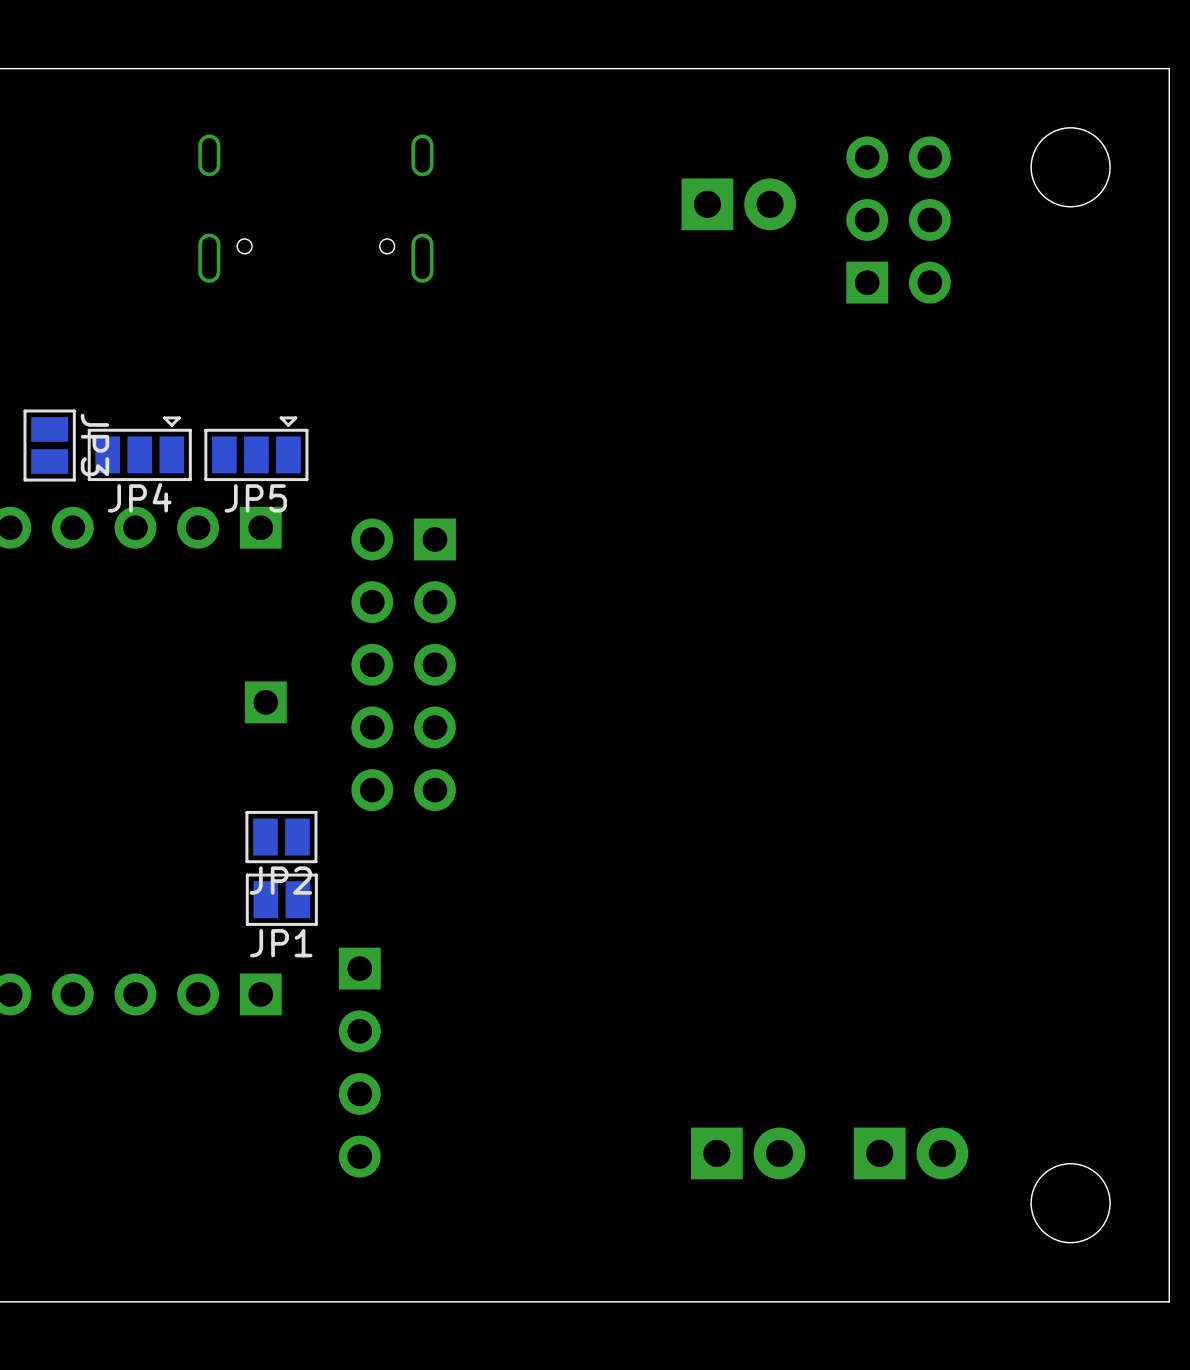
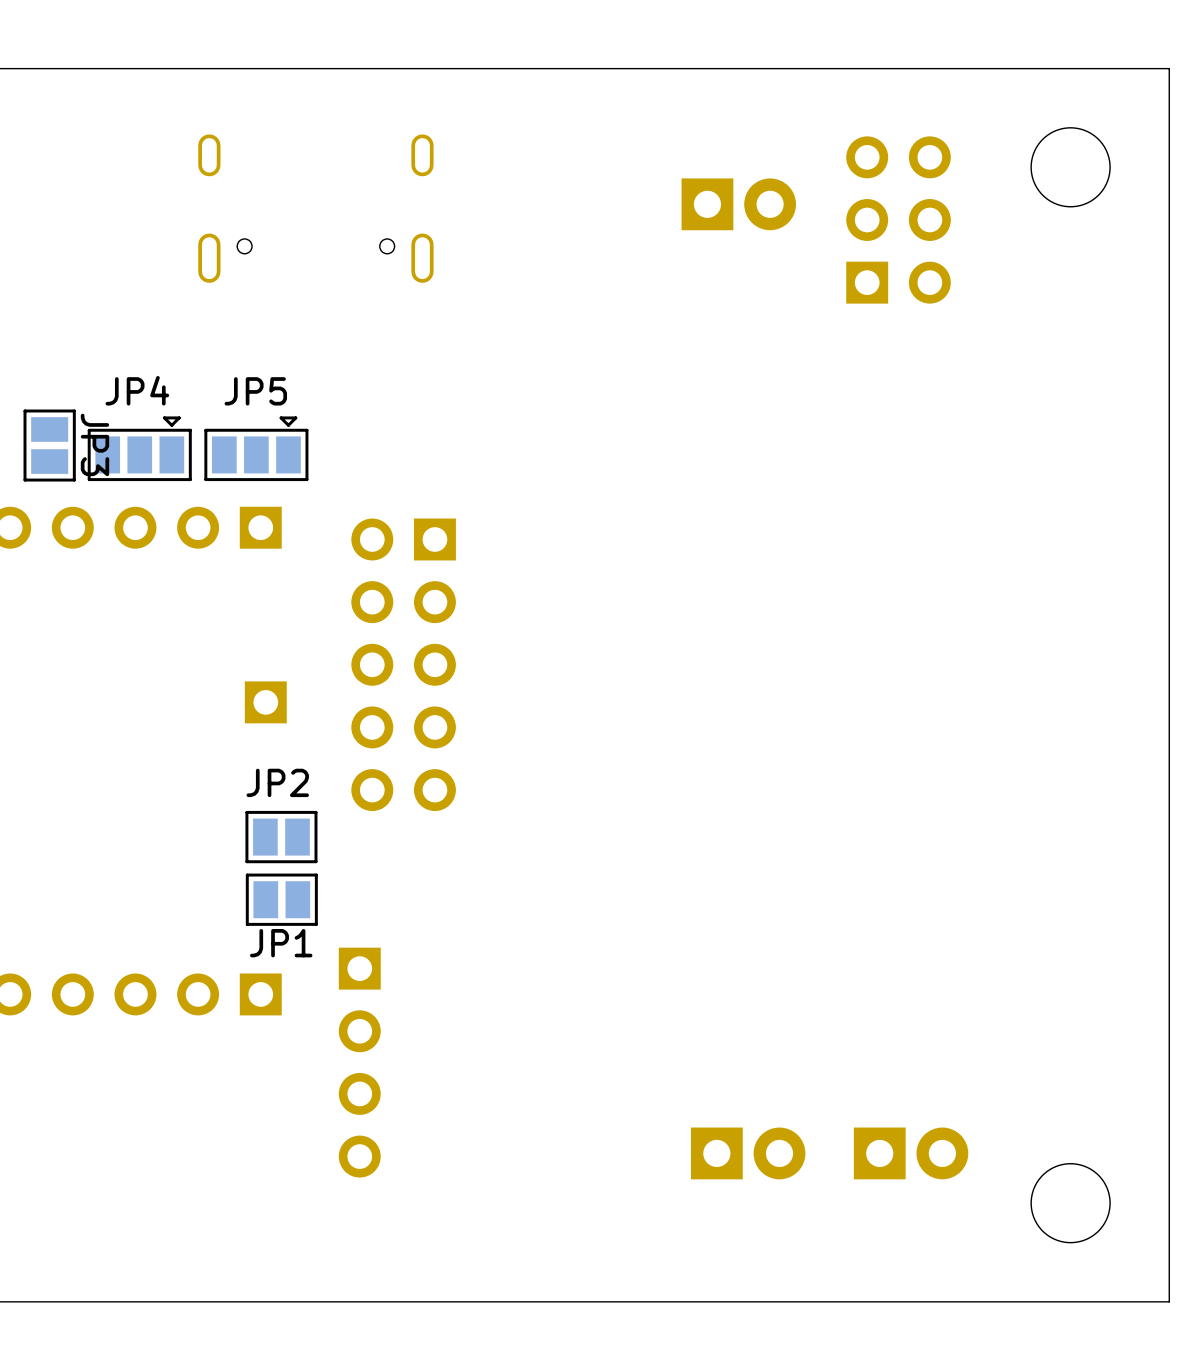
JP4 name position: JP4 (139, 497) -> JP4 (137, 390)
JP5 name position: JP5 (255, 498) -> JP5 (255, 391)
JP2 name position: JP2 (280, 880) -> JP2 (277, 782)

